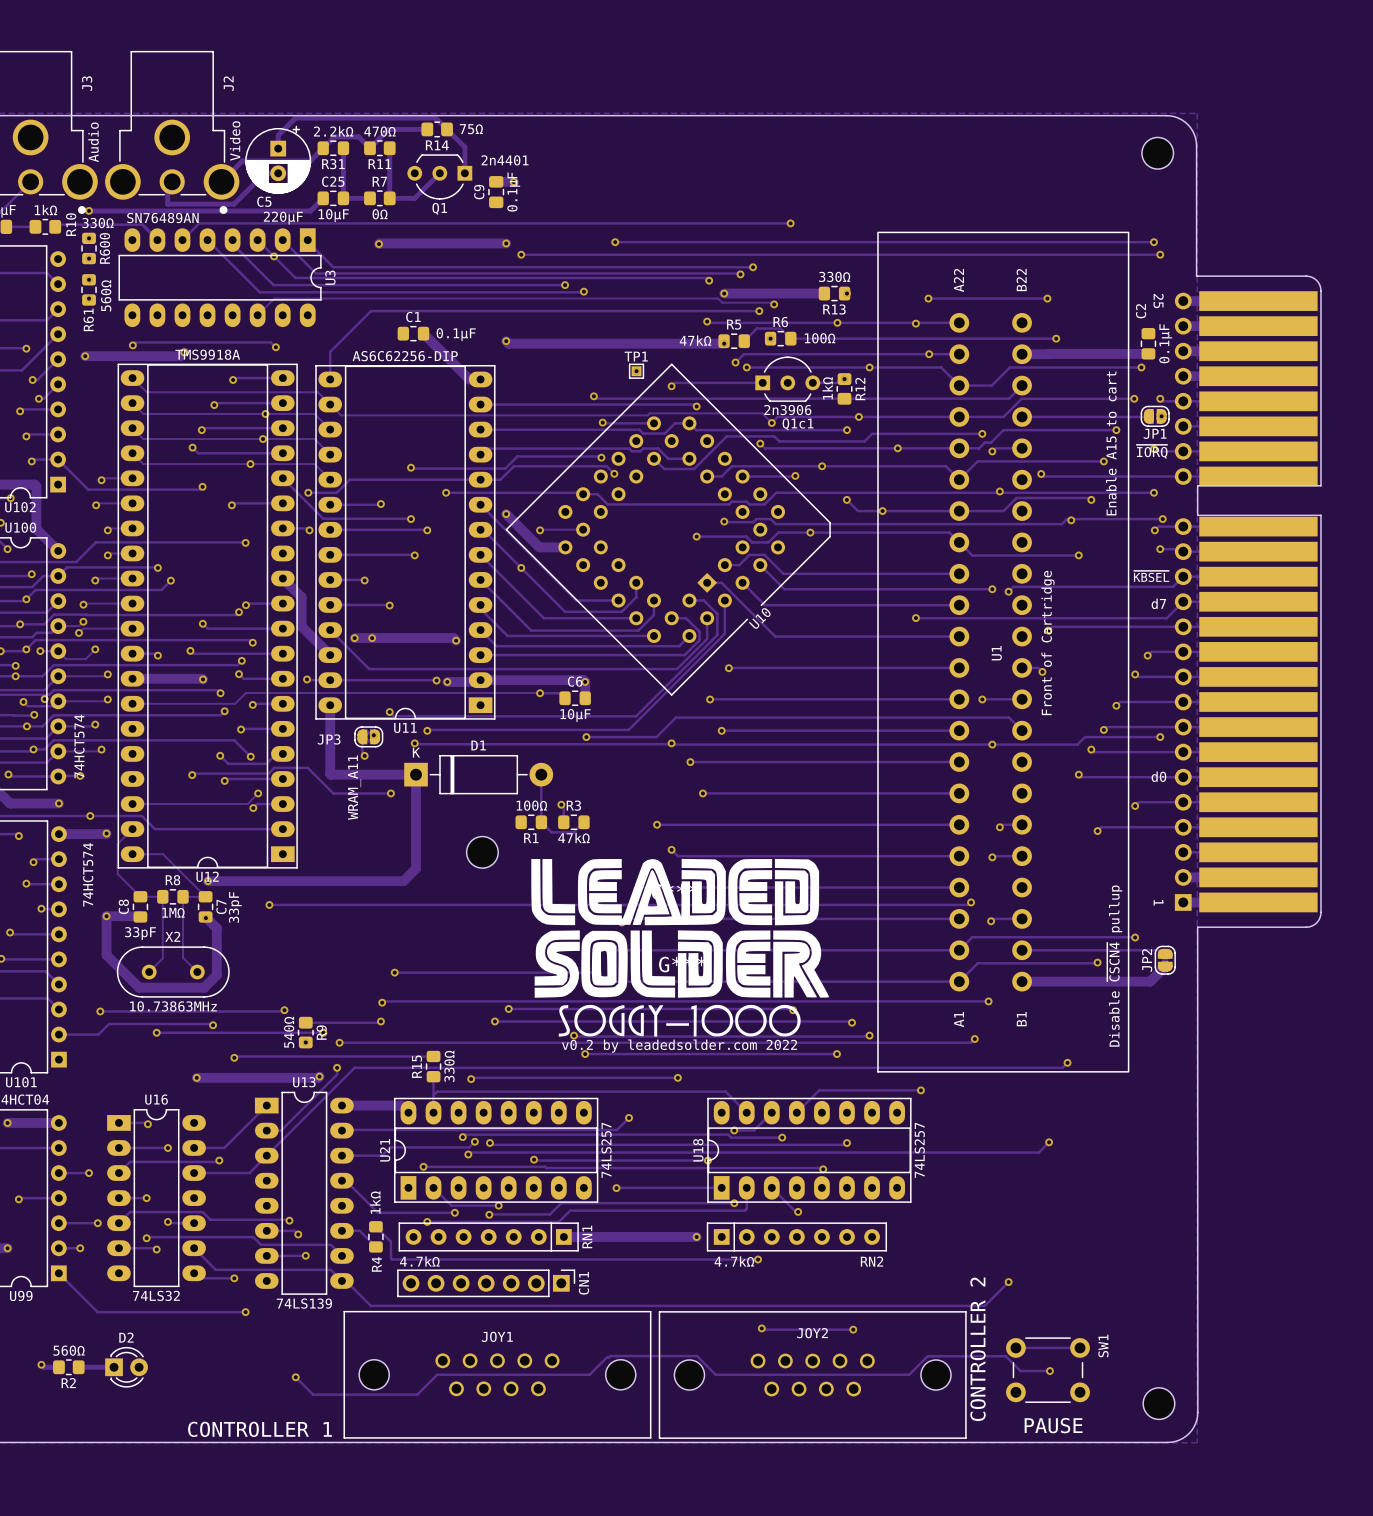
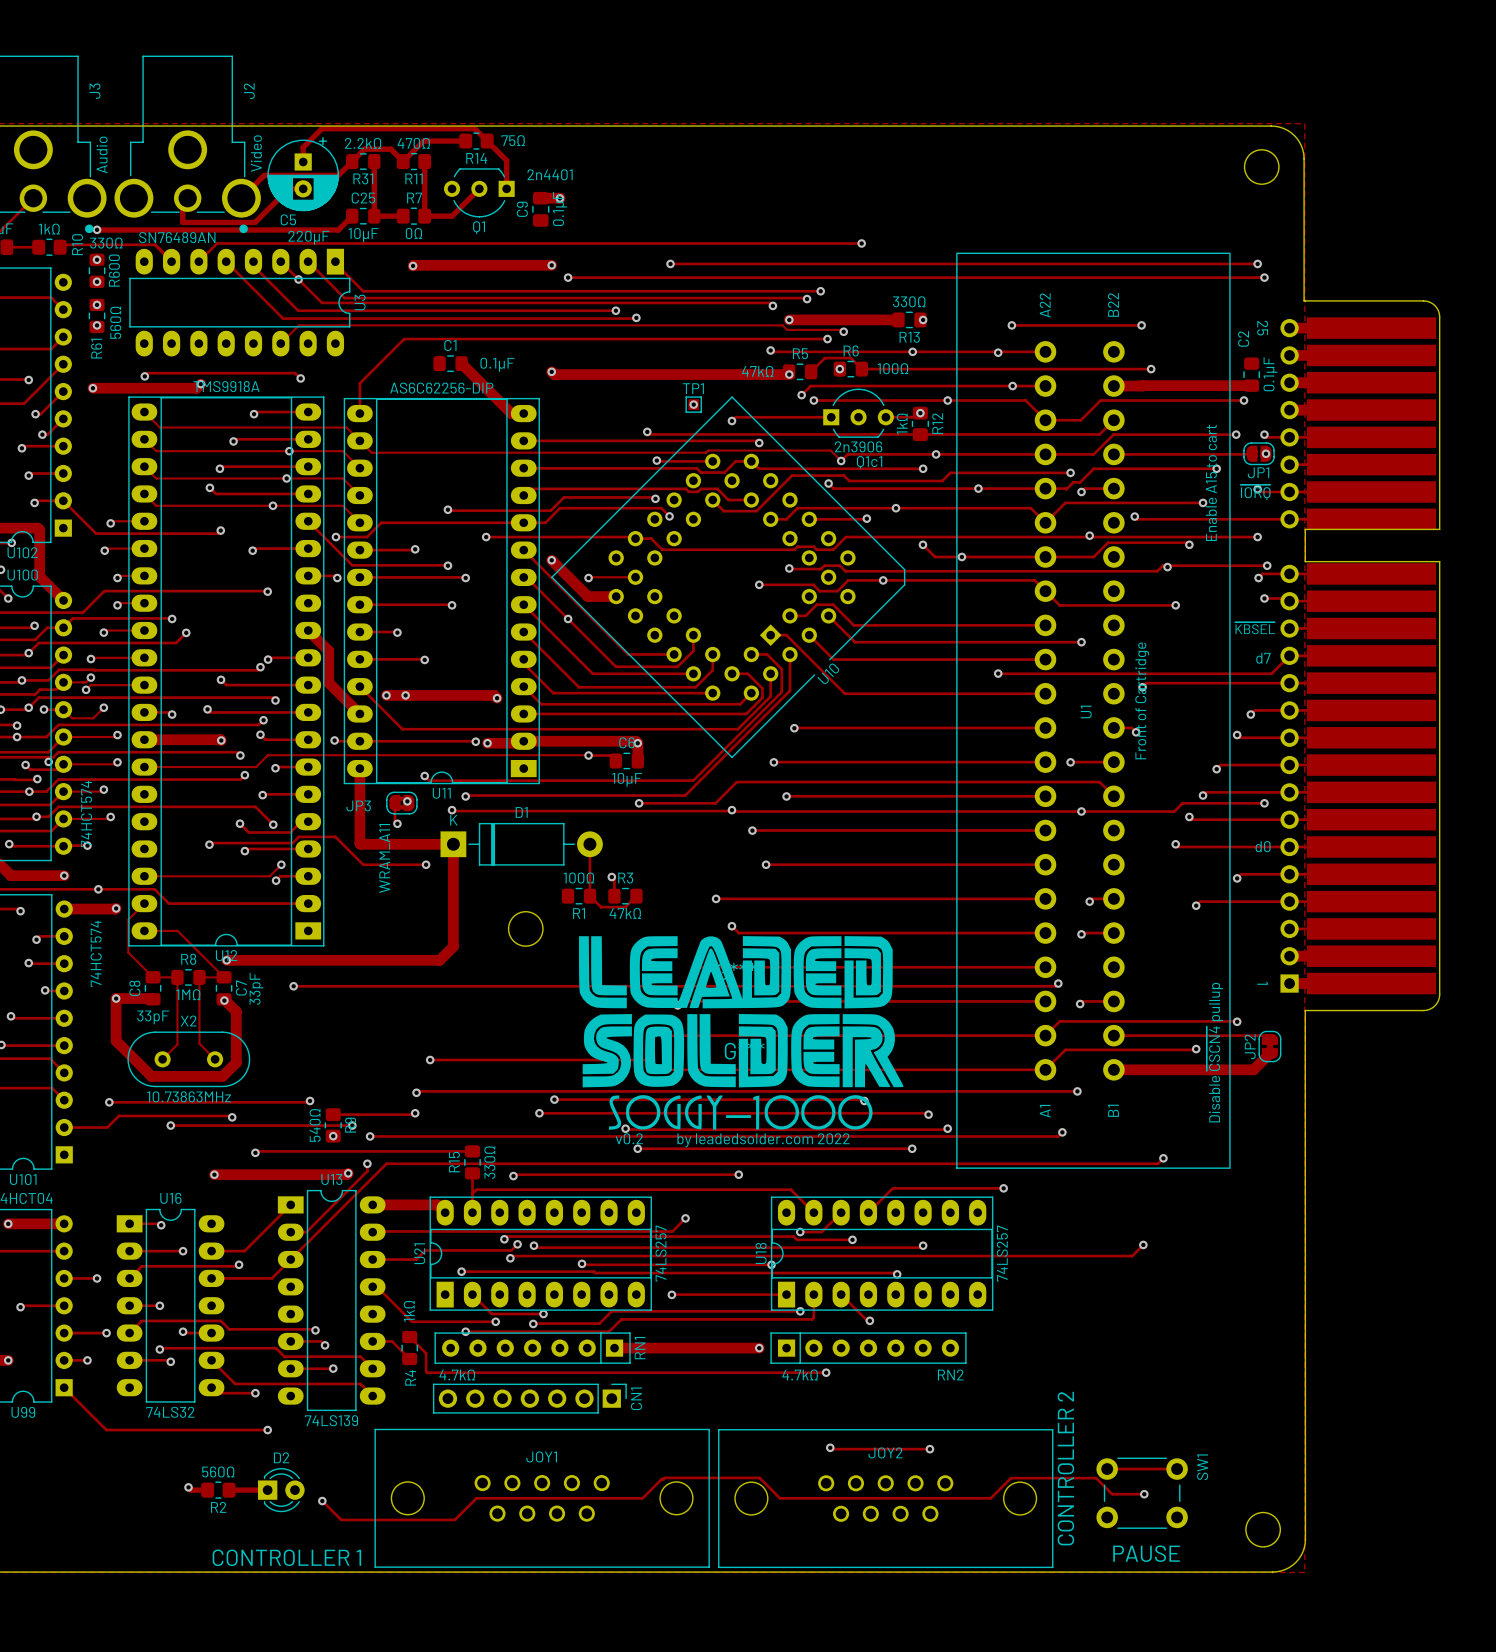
track: (1183, 576) (1173, 586) (1013, 586) (1008, 591) -> none
via: (1008, 591) -> none
track: (341, 1280) (346, 1280) (370, 1305) (984, 1305) (1008, 1282) -> none
via: (1008, 1282) -> none
track: (41, 1364) (43, 1367) (58, 1367) -> (188, 1487) (191, 1490) (207, 1490)
via: (41, 1364) -> none
via: none -> (188, 1487)
R2 position: (68, 1367) -> (218, 1490)
track: (78, 1367) (114, 1367) -> (229, 1490) (267, 1490)
D2 position: (126, 1367) -> (281, 1490)

